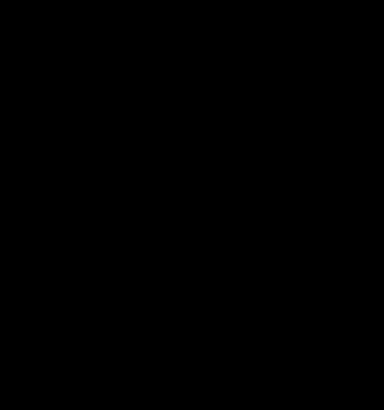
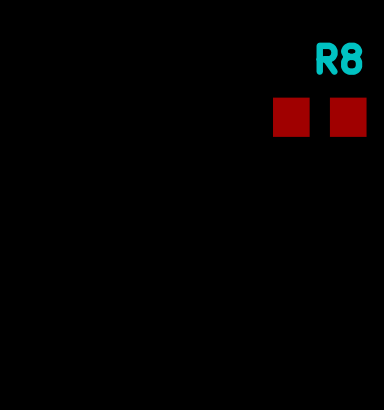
R8: none -> (319, 117)

